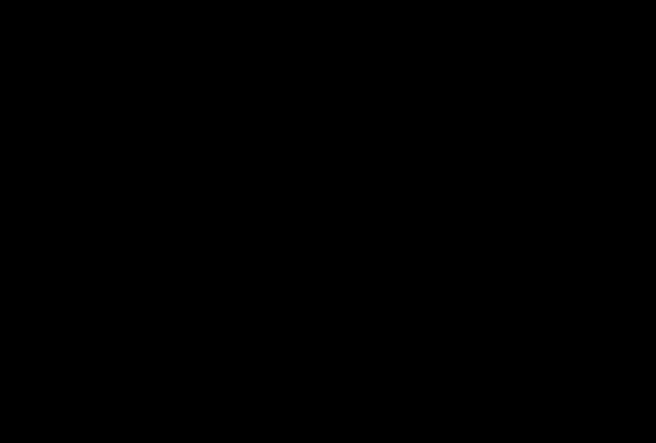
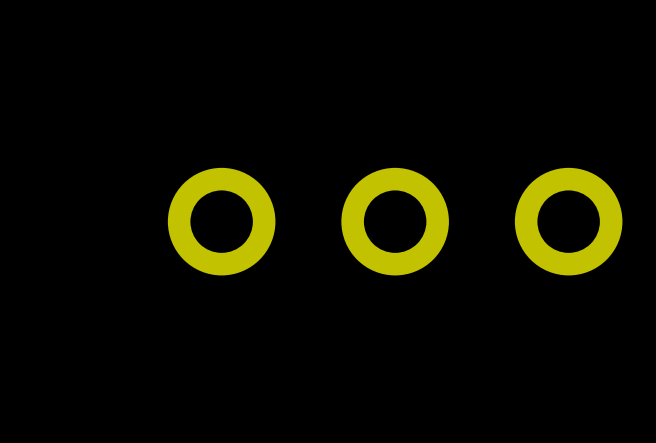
part: none -> (395, 221)

